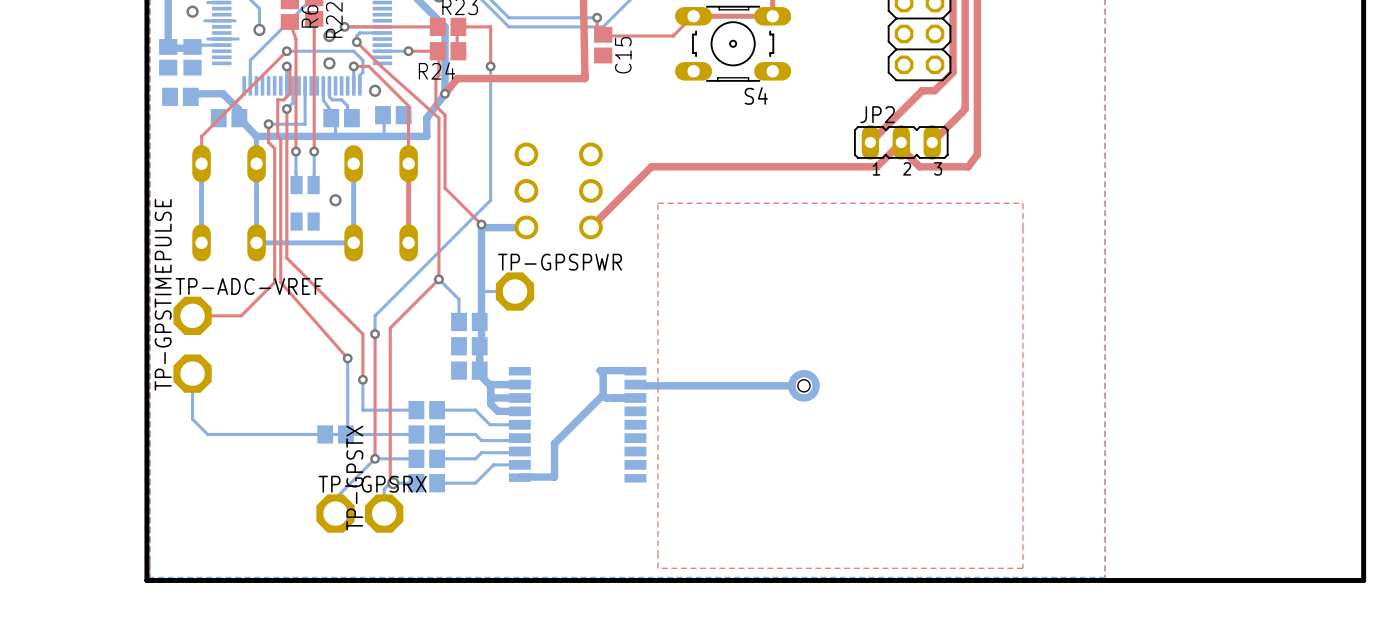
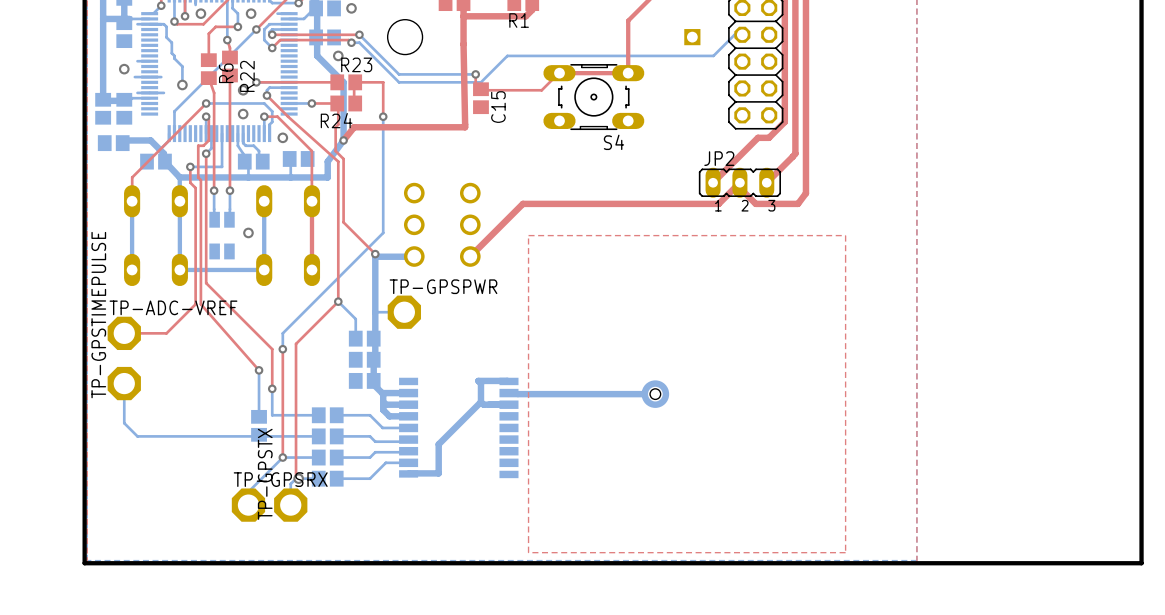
bottom track: (347, 411) (347, 432) -> none
part rotation: 0° (335, 434) -> 90° clockwise (259, 425)

